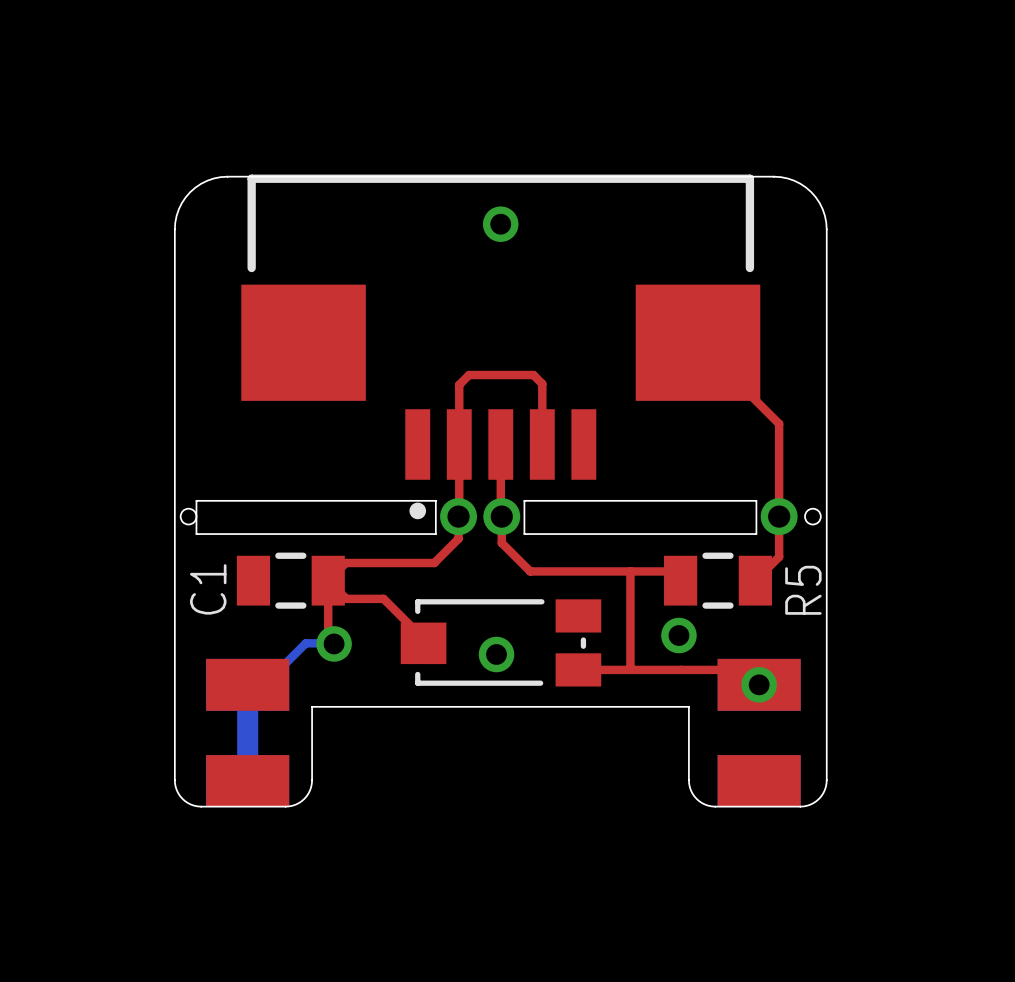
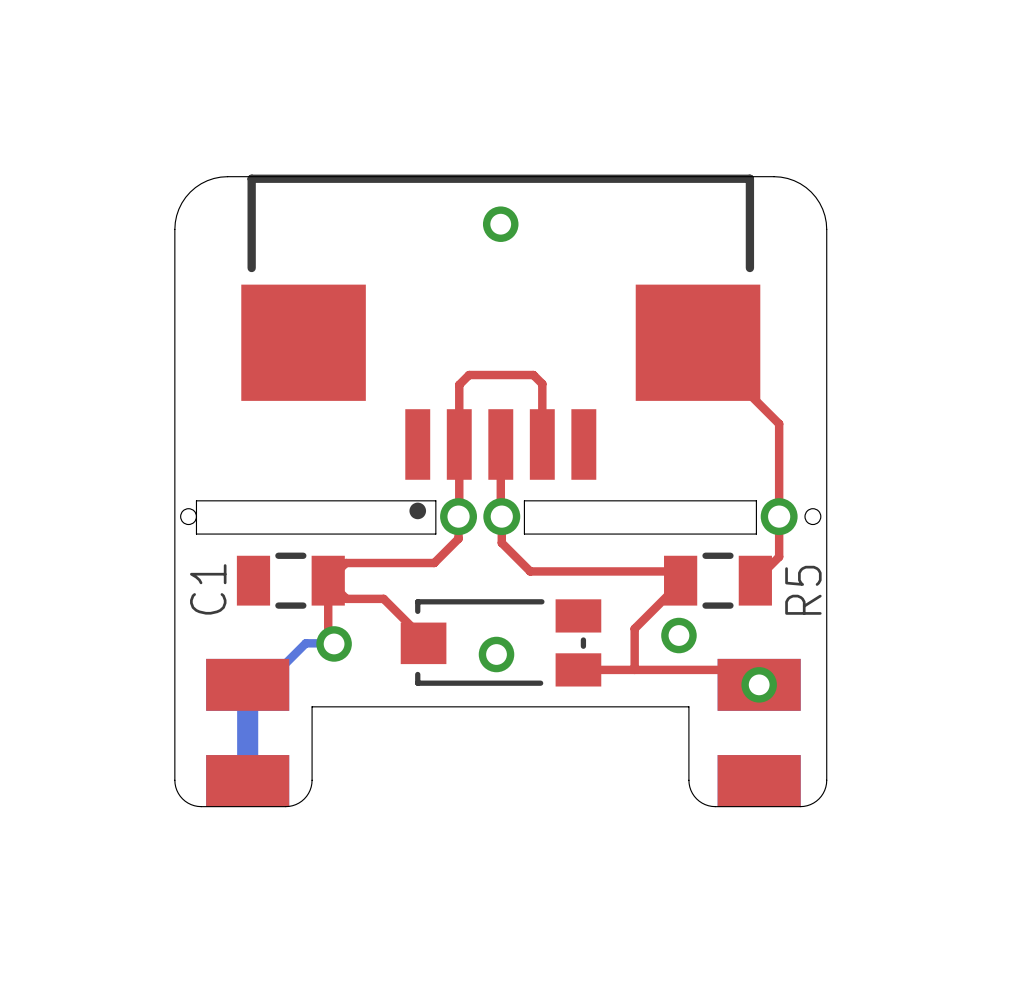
top track: (630, 571) (630, 669) -> none
top track: none -> (680, 580) (634, 628) (634, 669)

